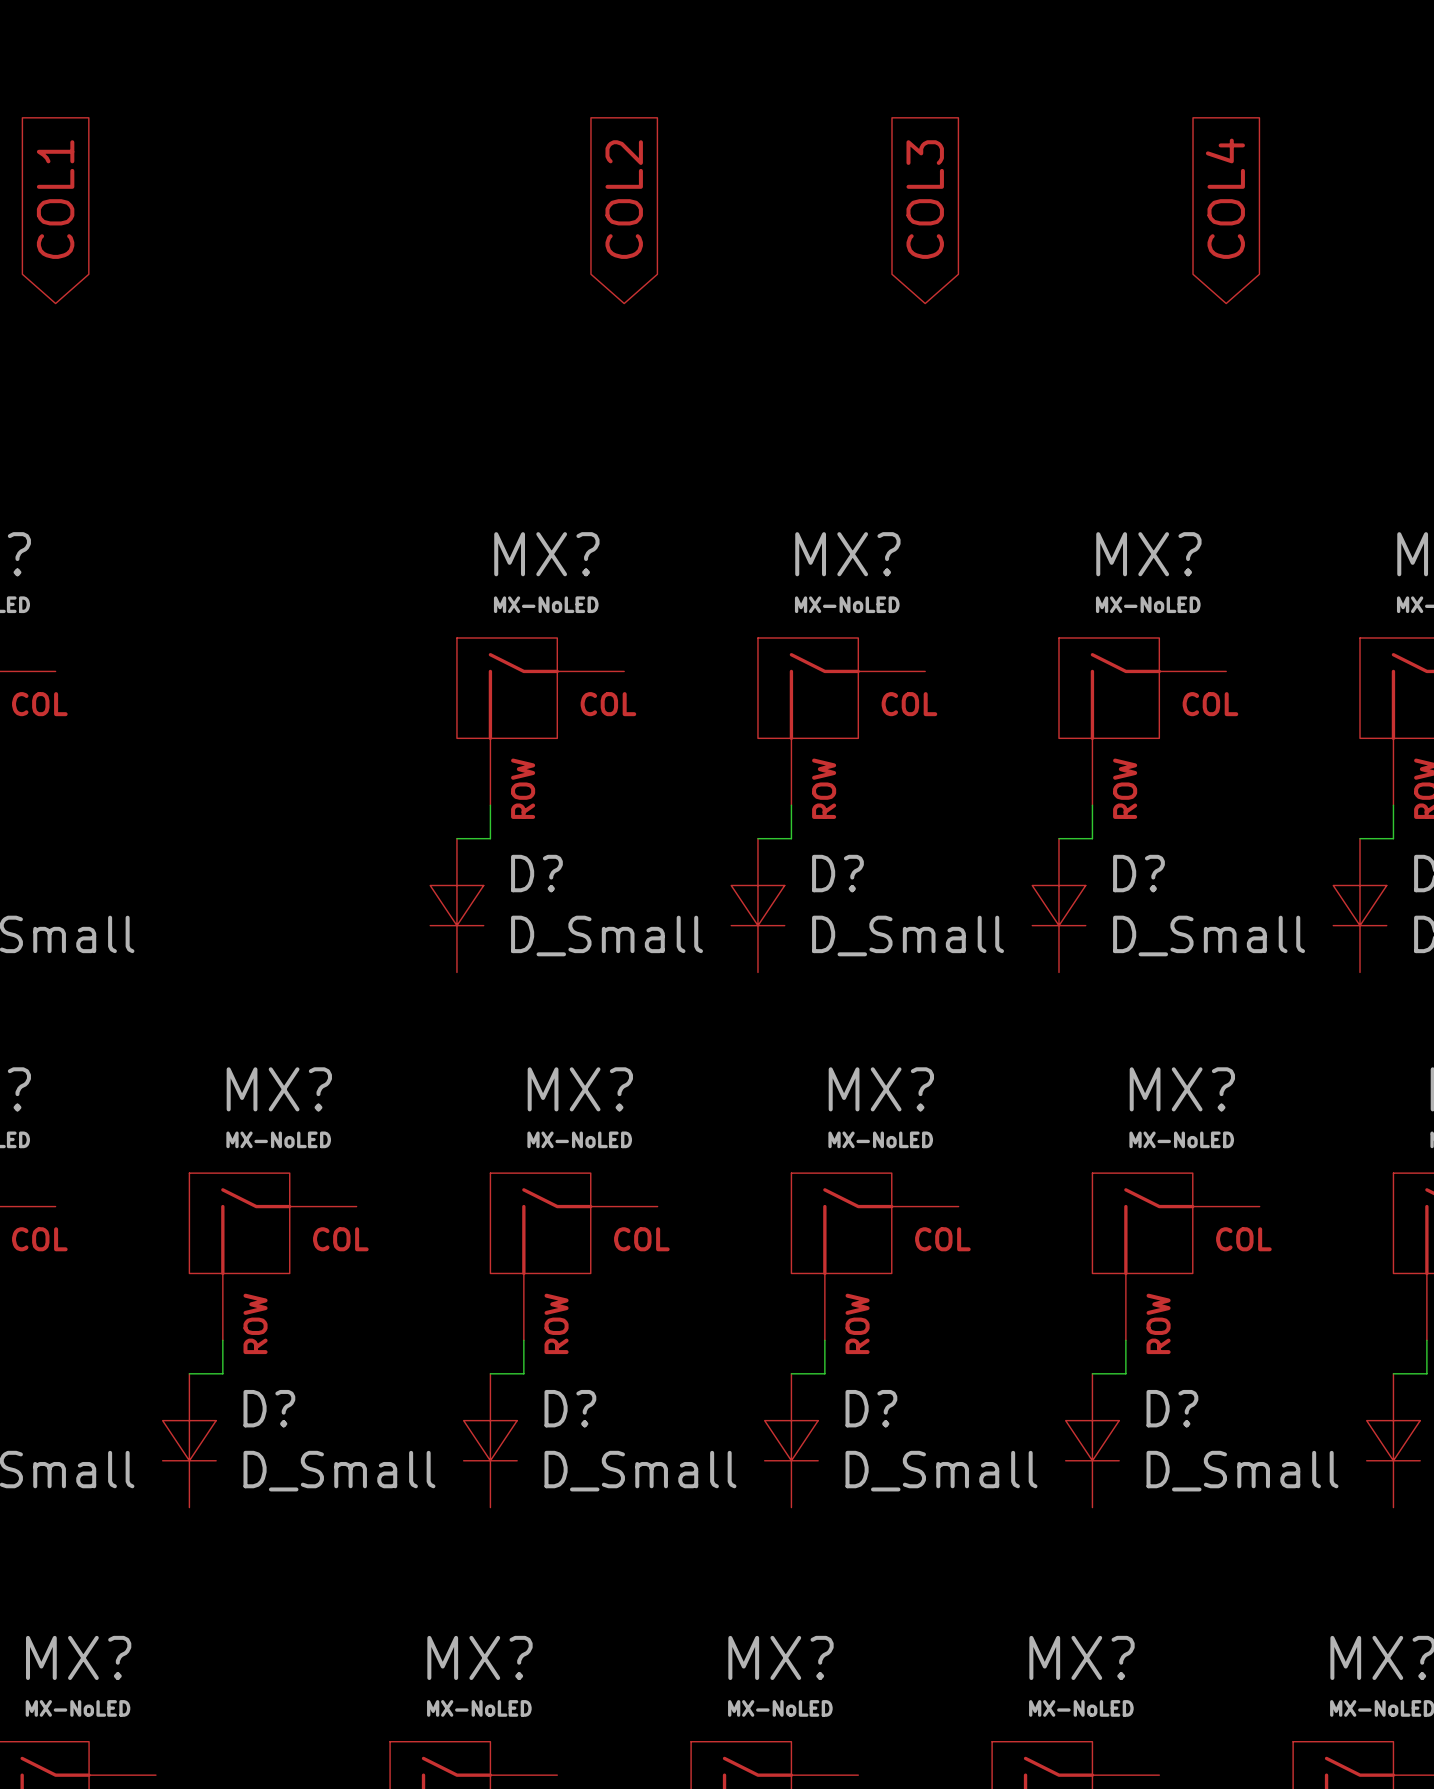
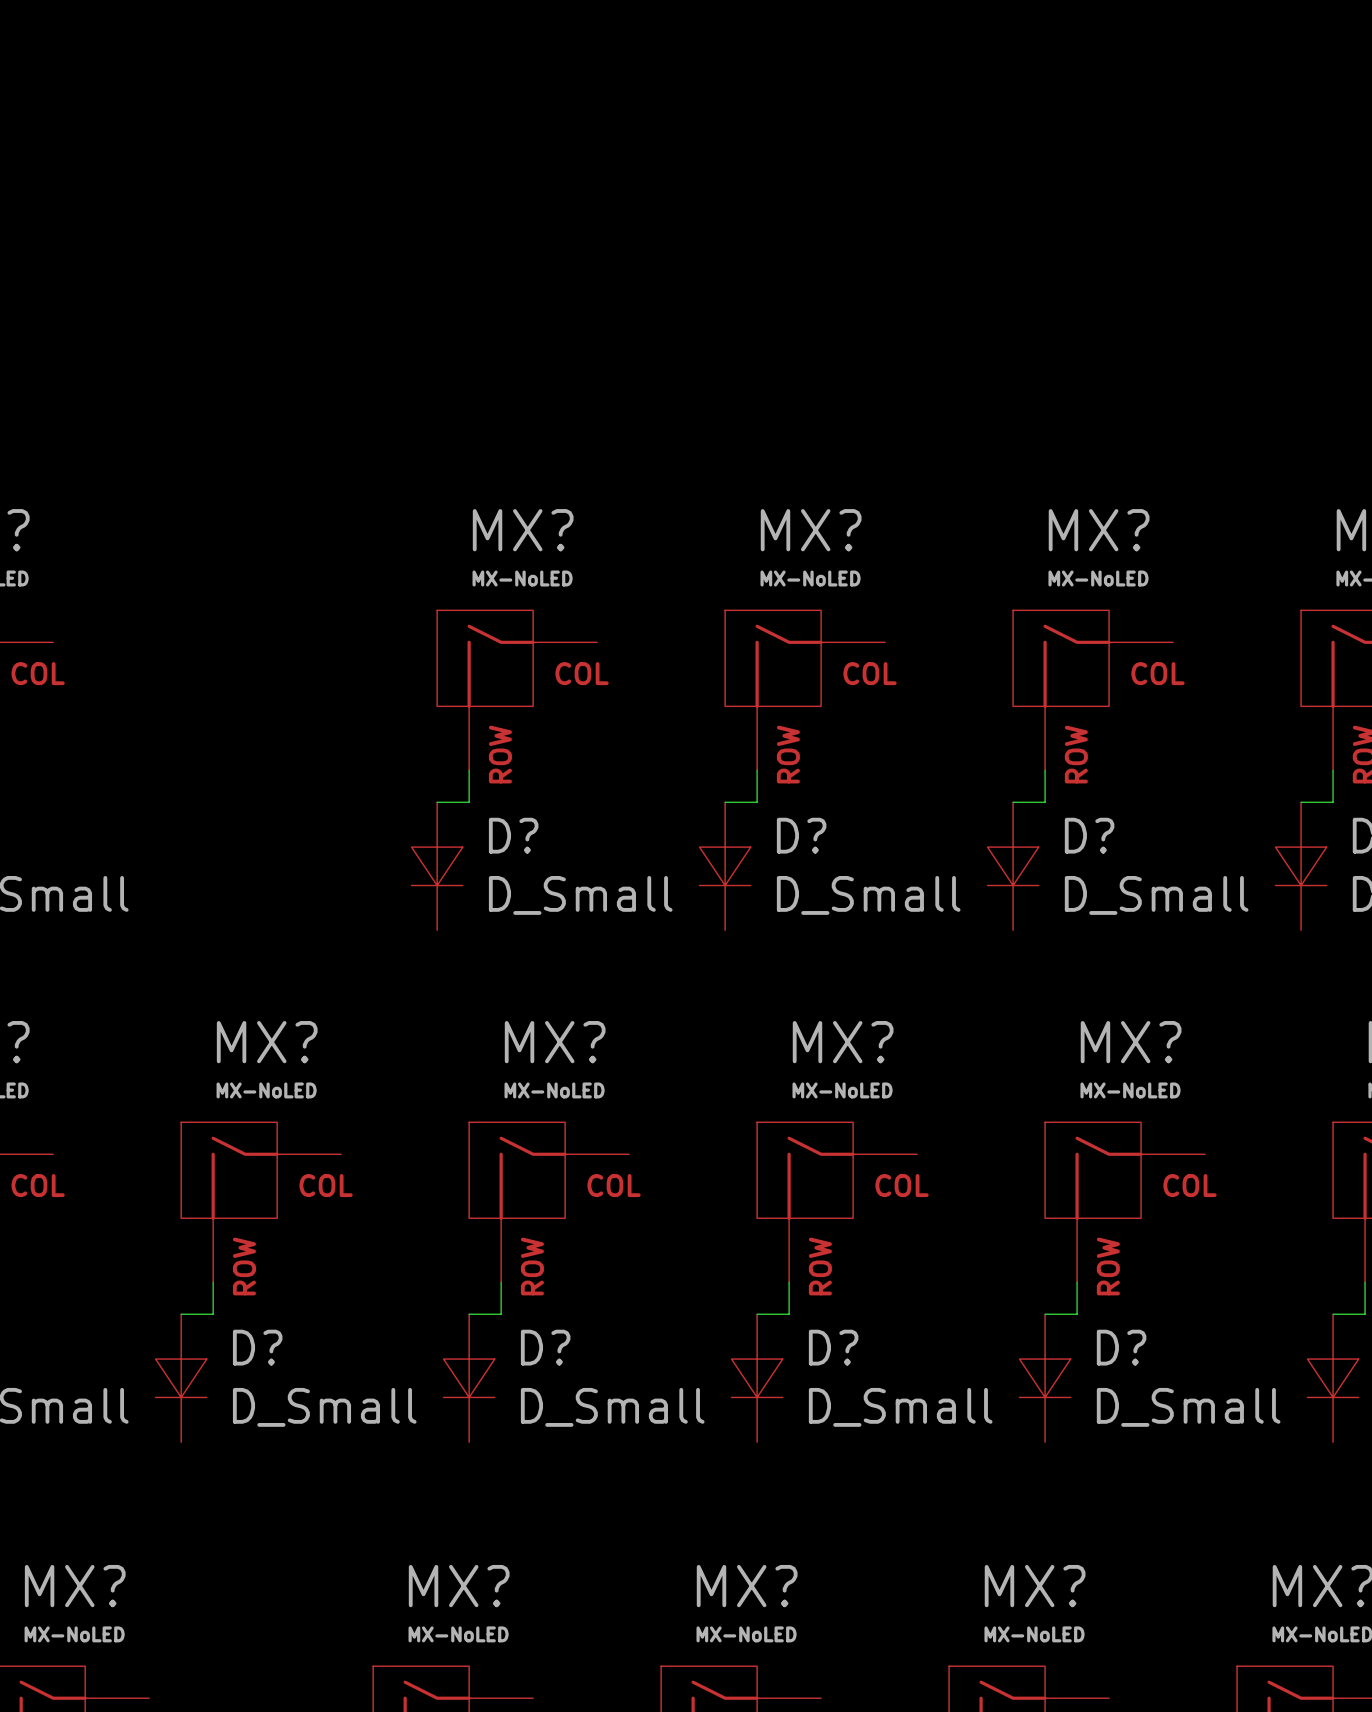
global label: COL4 (1225, 198) -> none
global label: COL1 (55, 199) -> none
global label: COL2 (624, 199) -> none
global label: COL3 (925, 199) -> none

